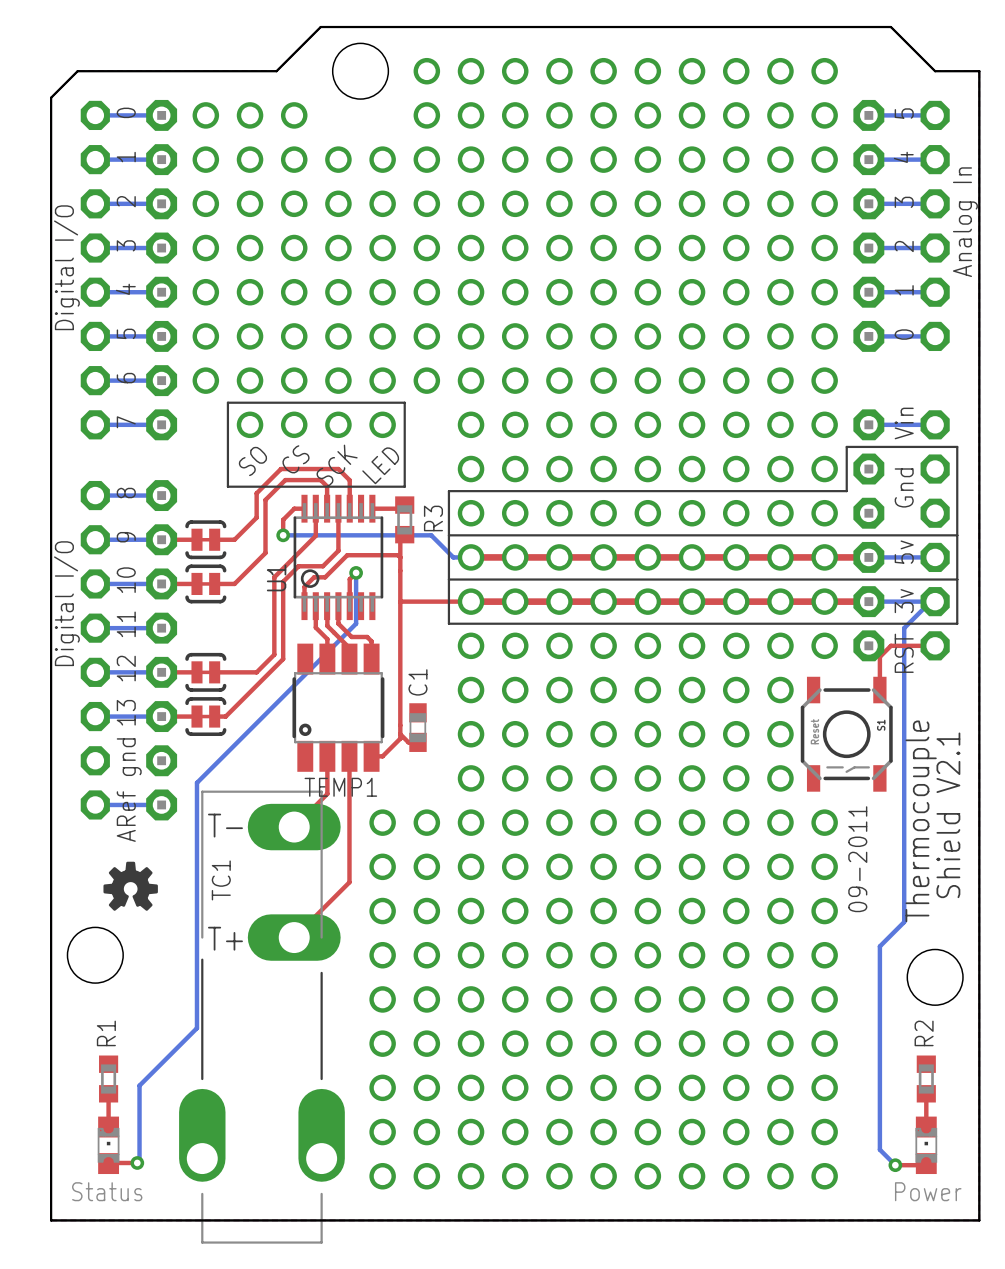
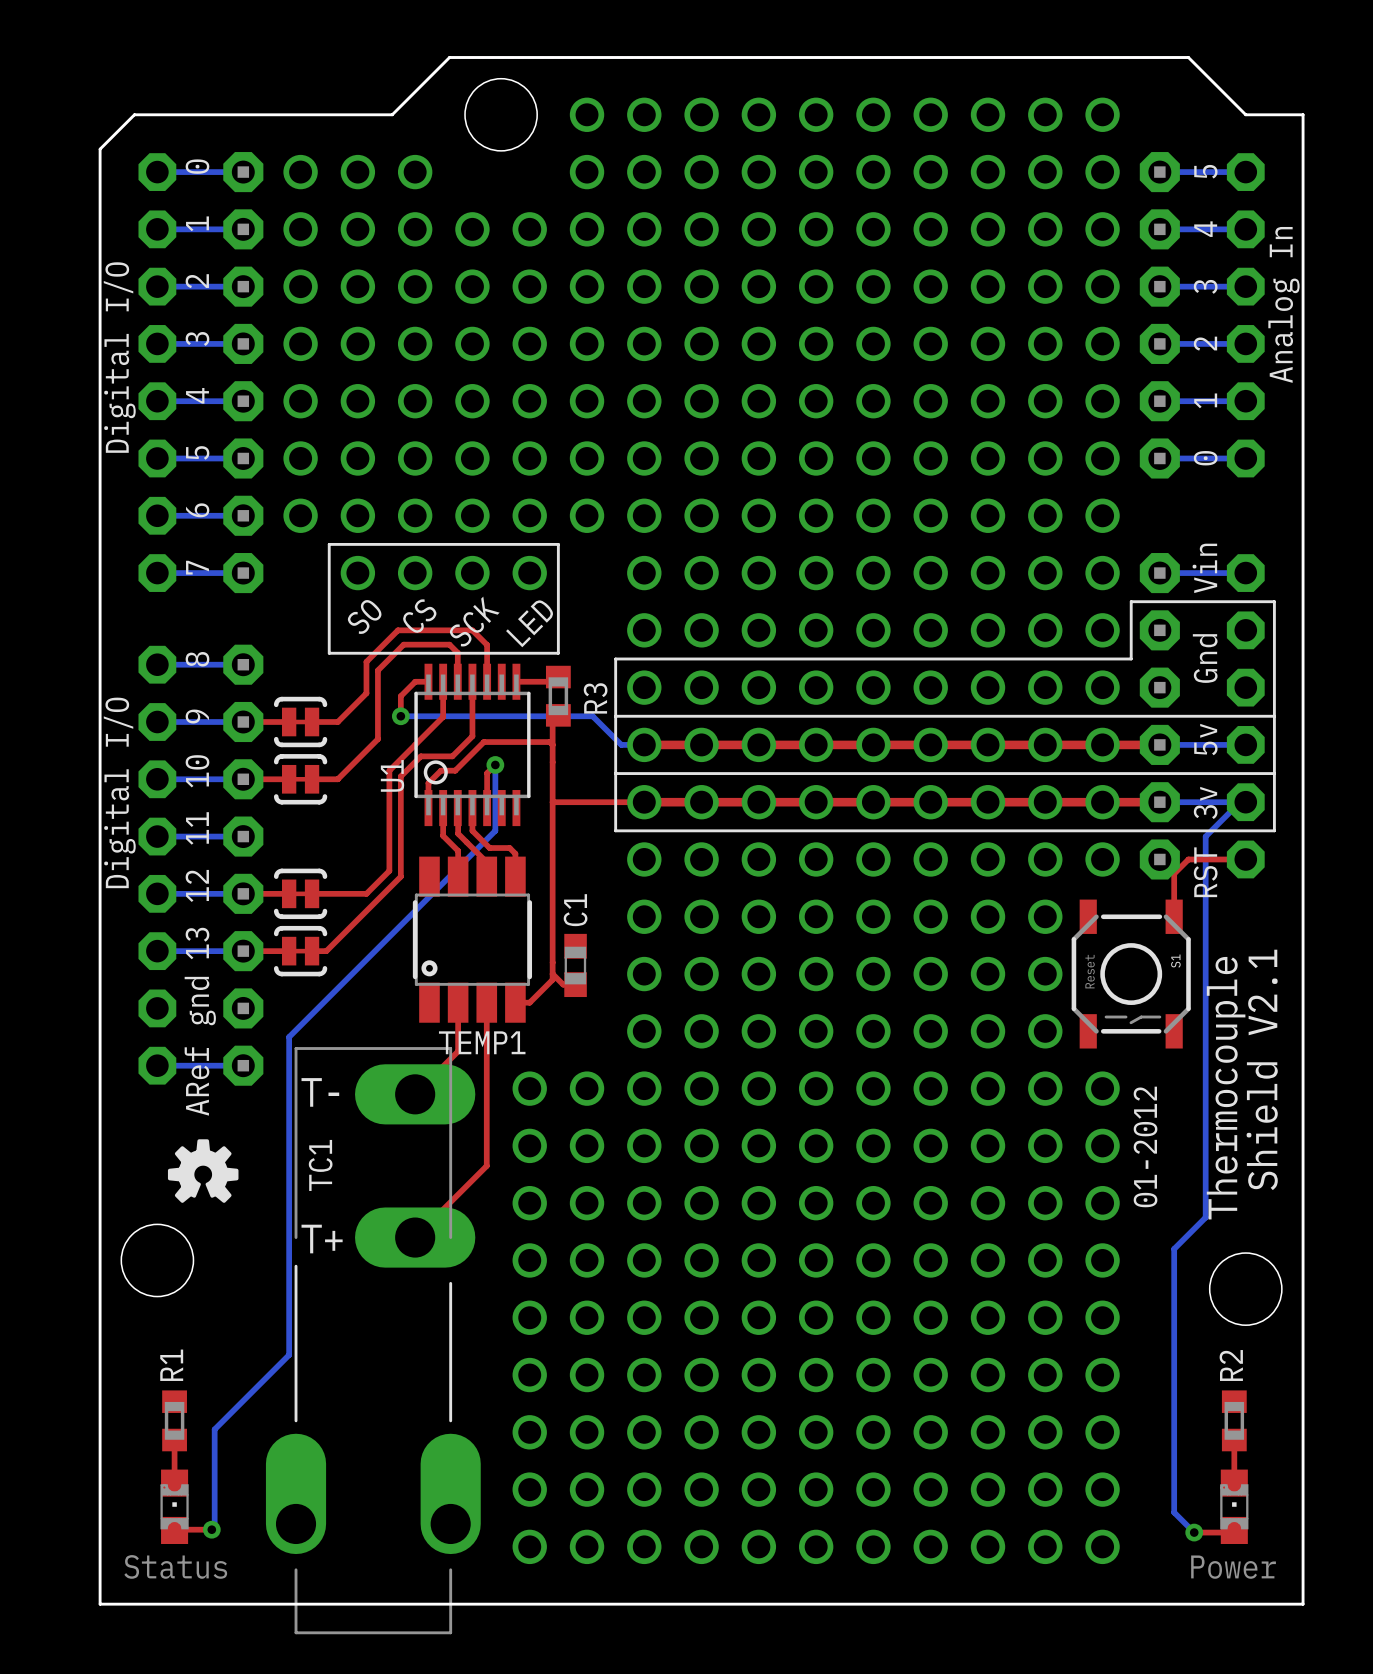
text: 09-2011 (857, 859) -> 01-2012 (1145, 1146)

